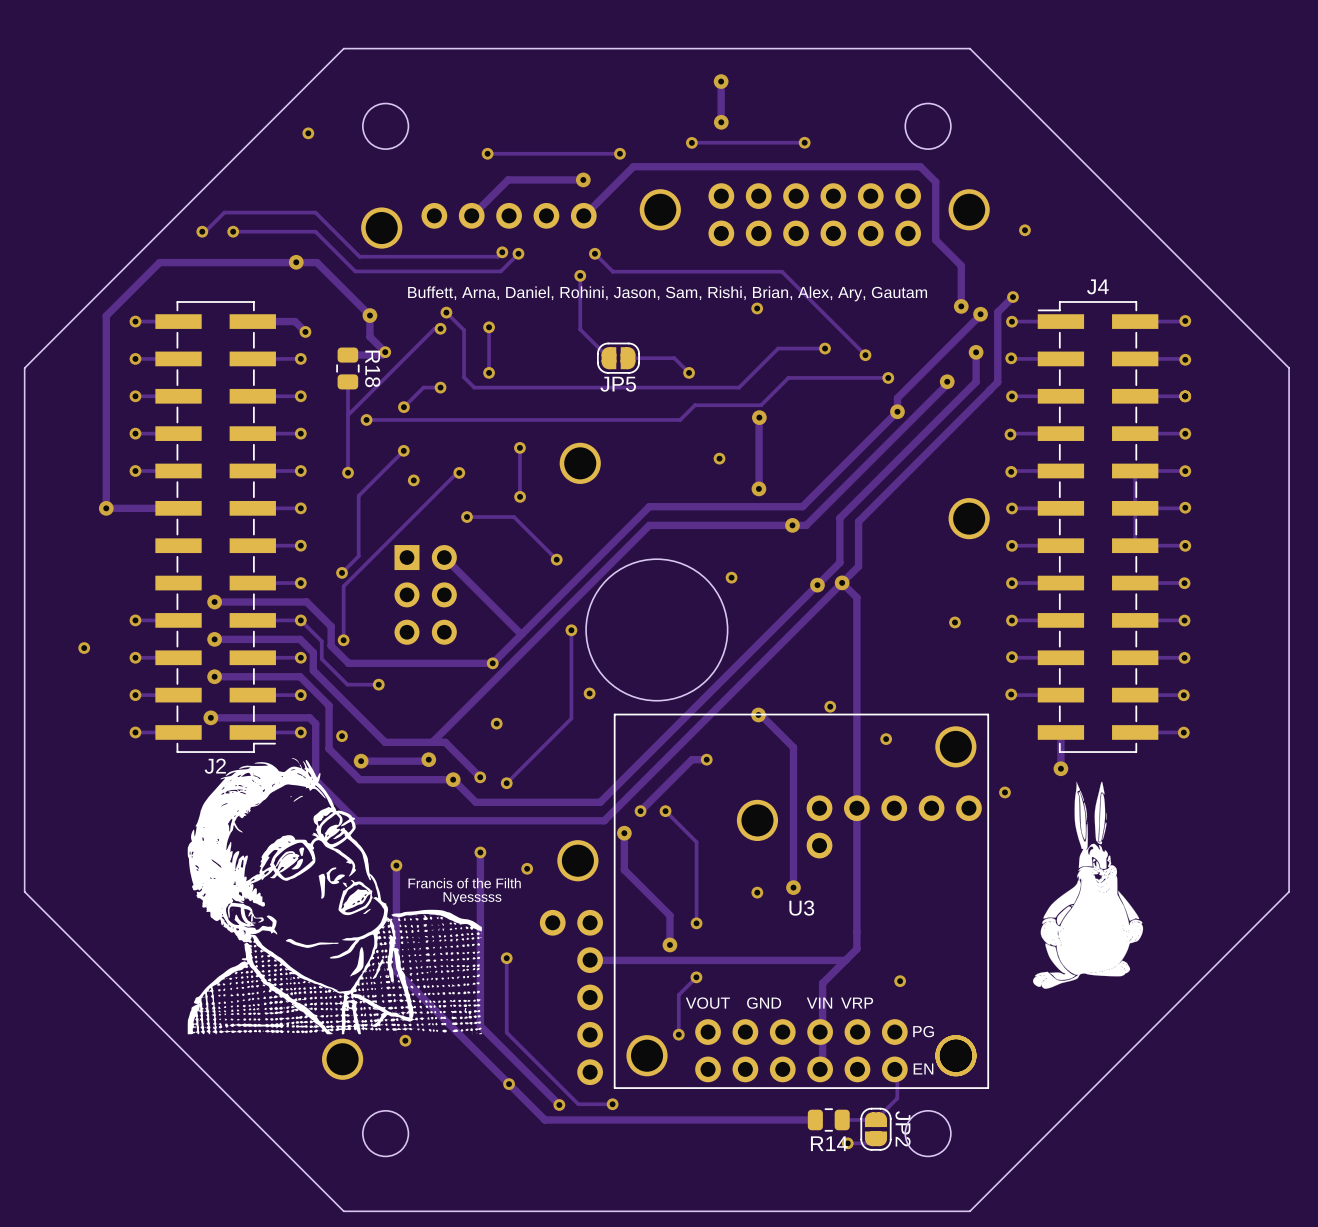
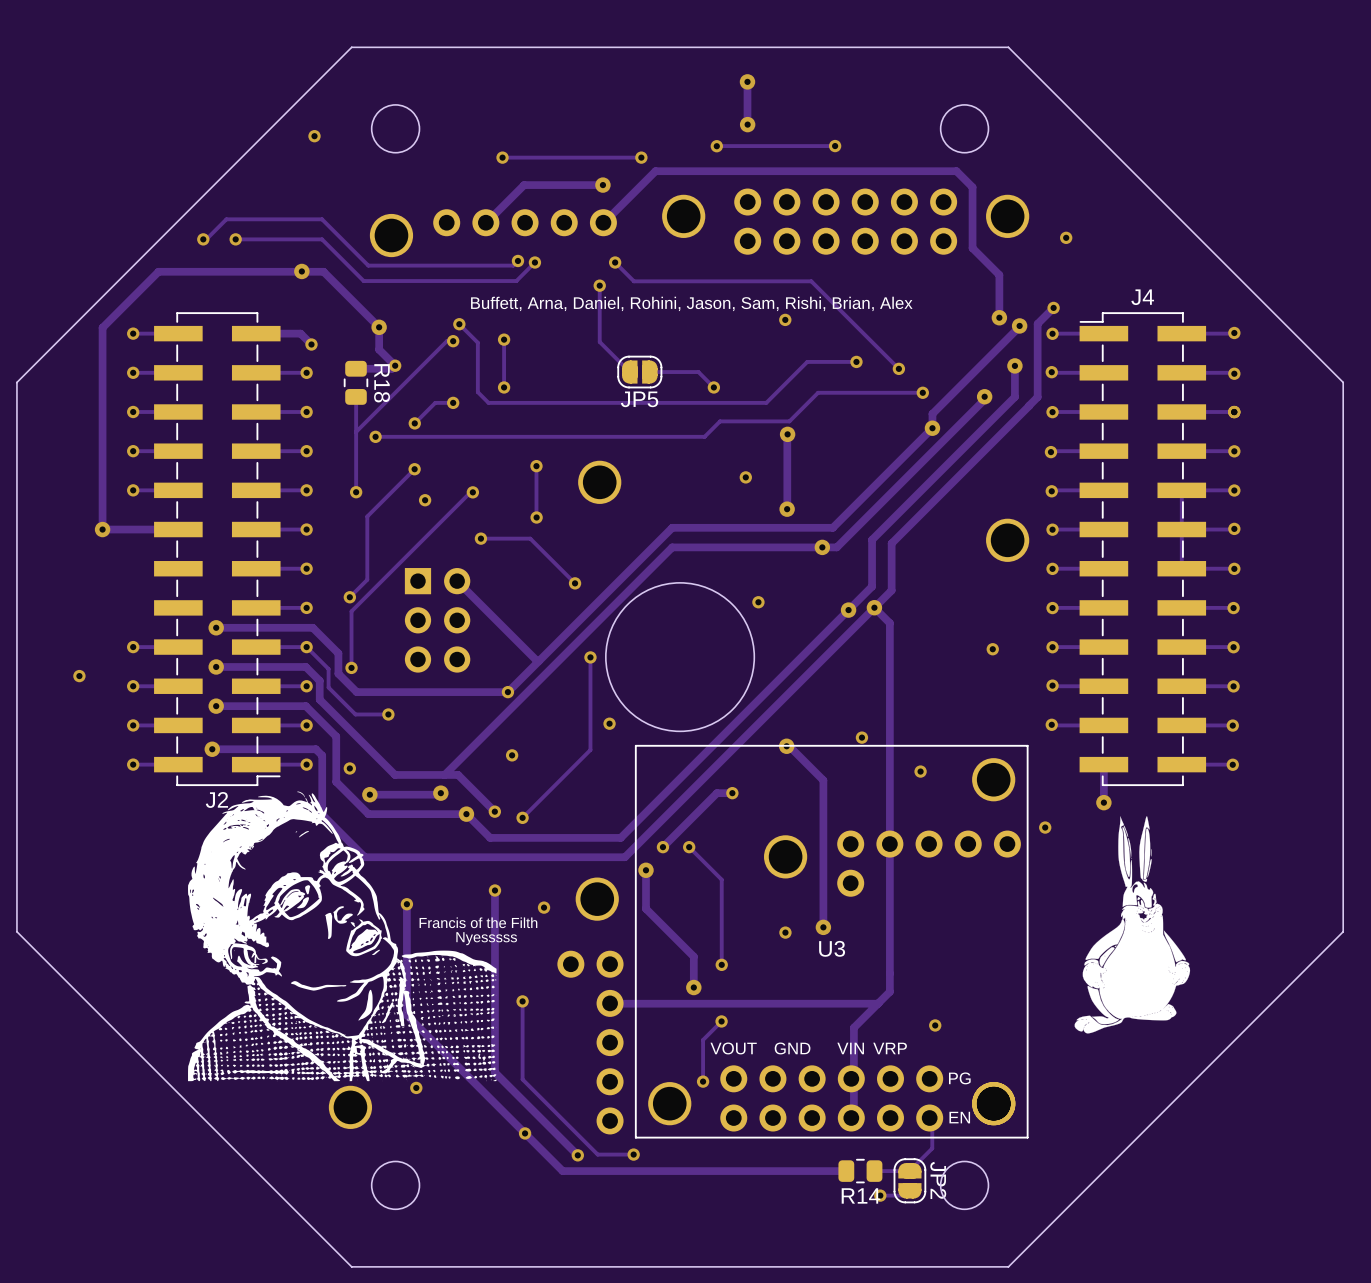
text: Buffett, Arna, Daniel, Rohini, Jason, Sam, Rishi, Brian, Alex, Ary, Gautam (667, 293) -> Buffett, Arna, Daniel, Rohini, Jason, Sam, Rishi, Brian, Alex (691, 303)

